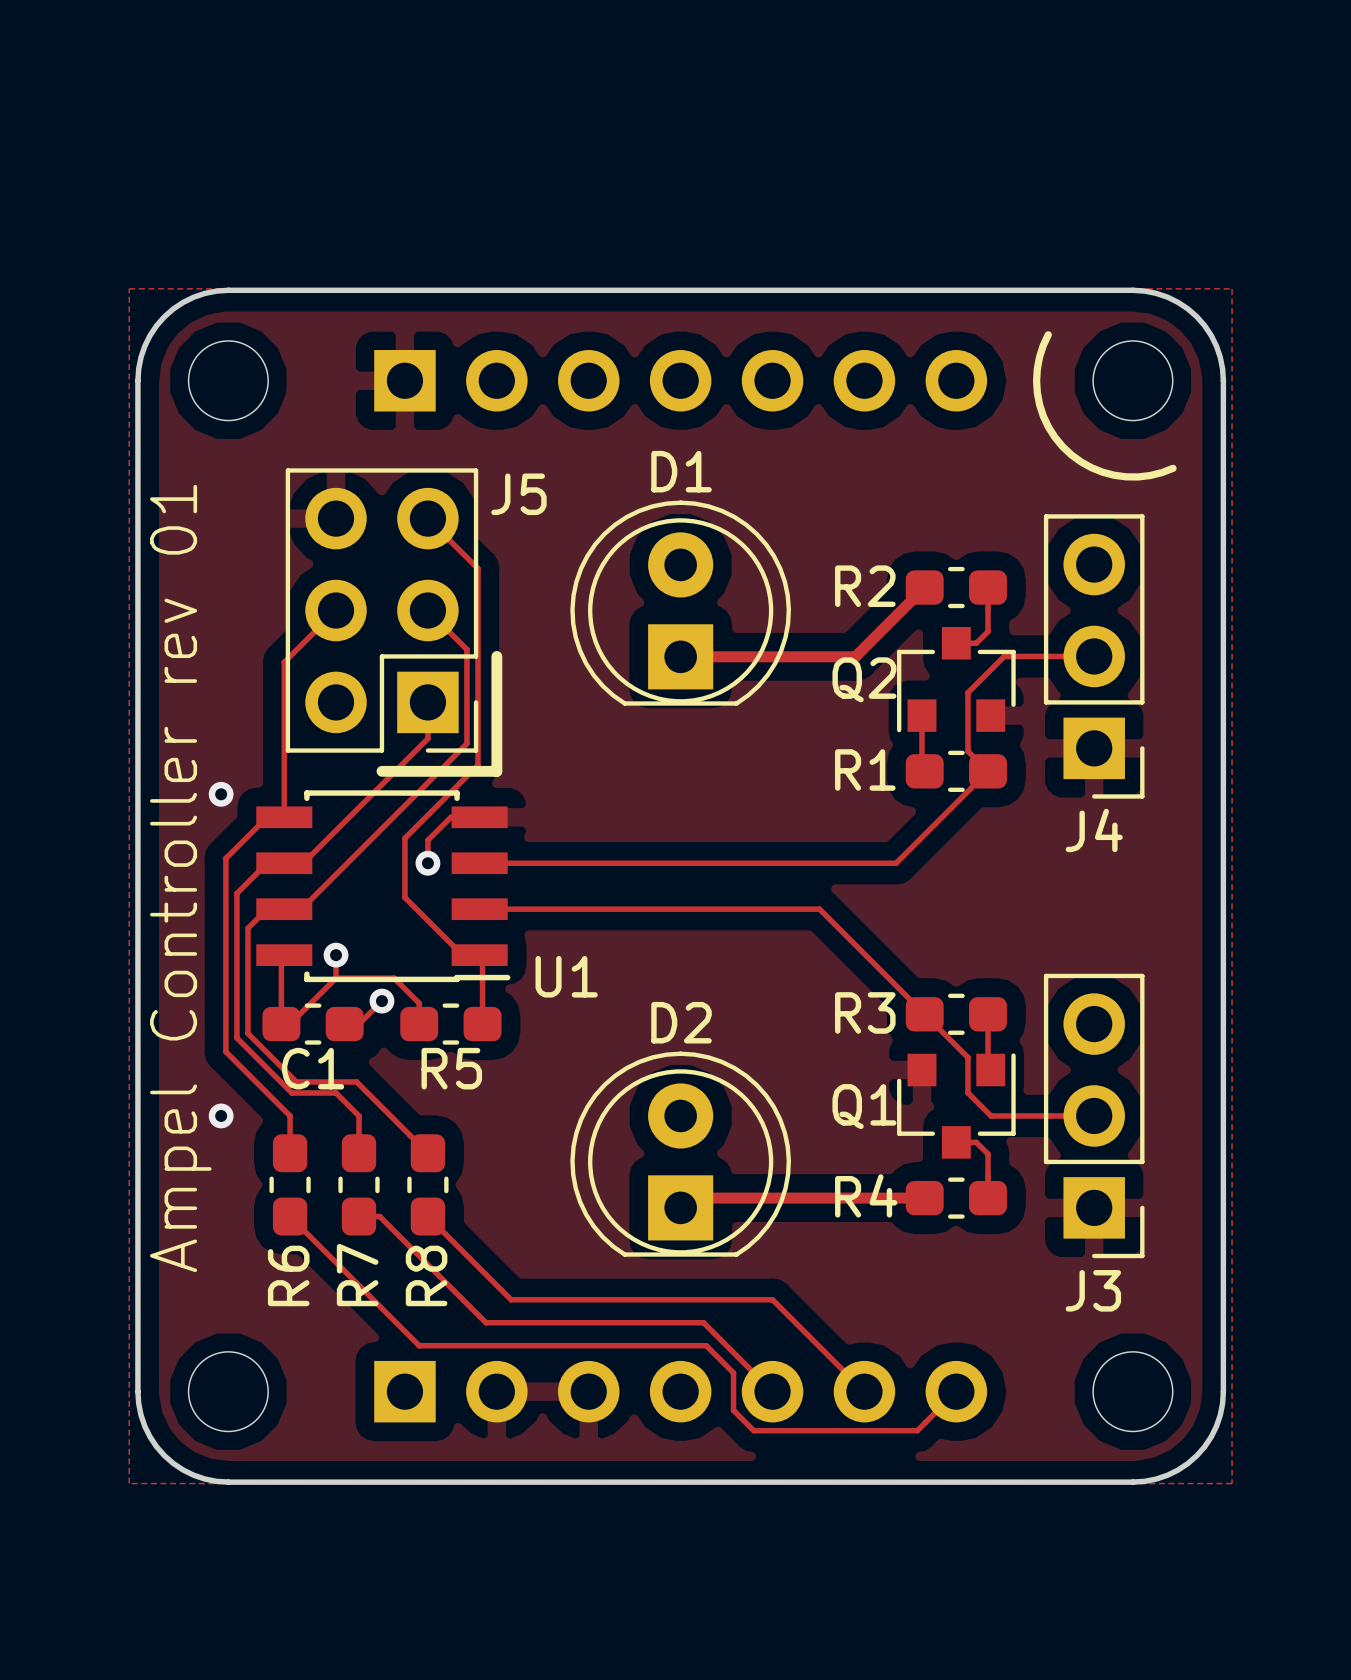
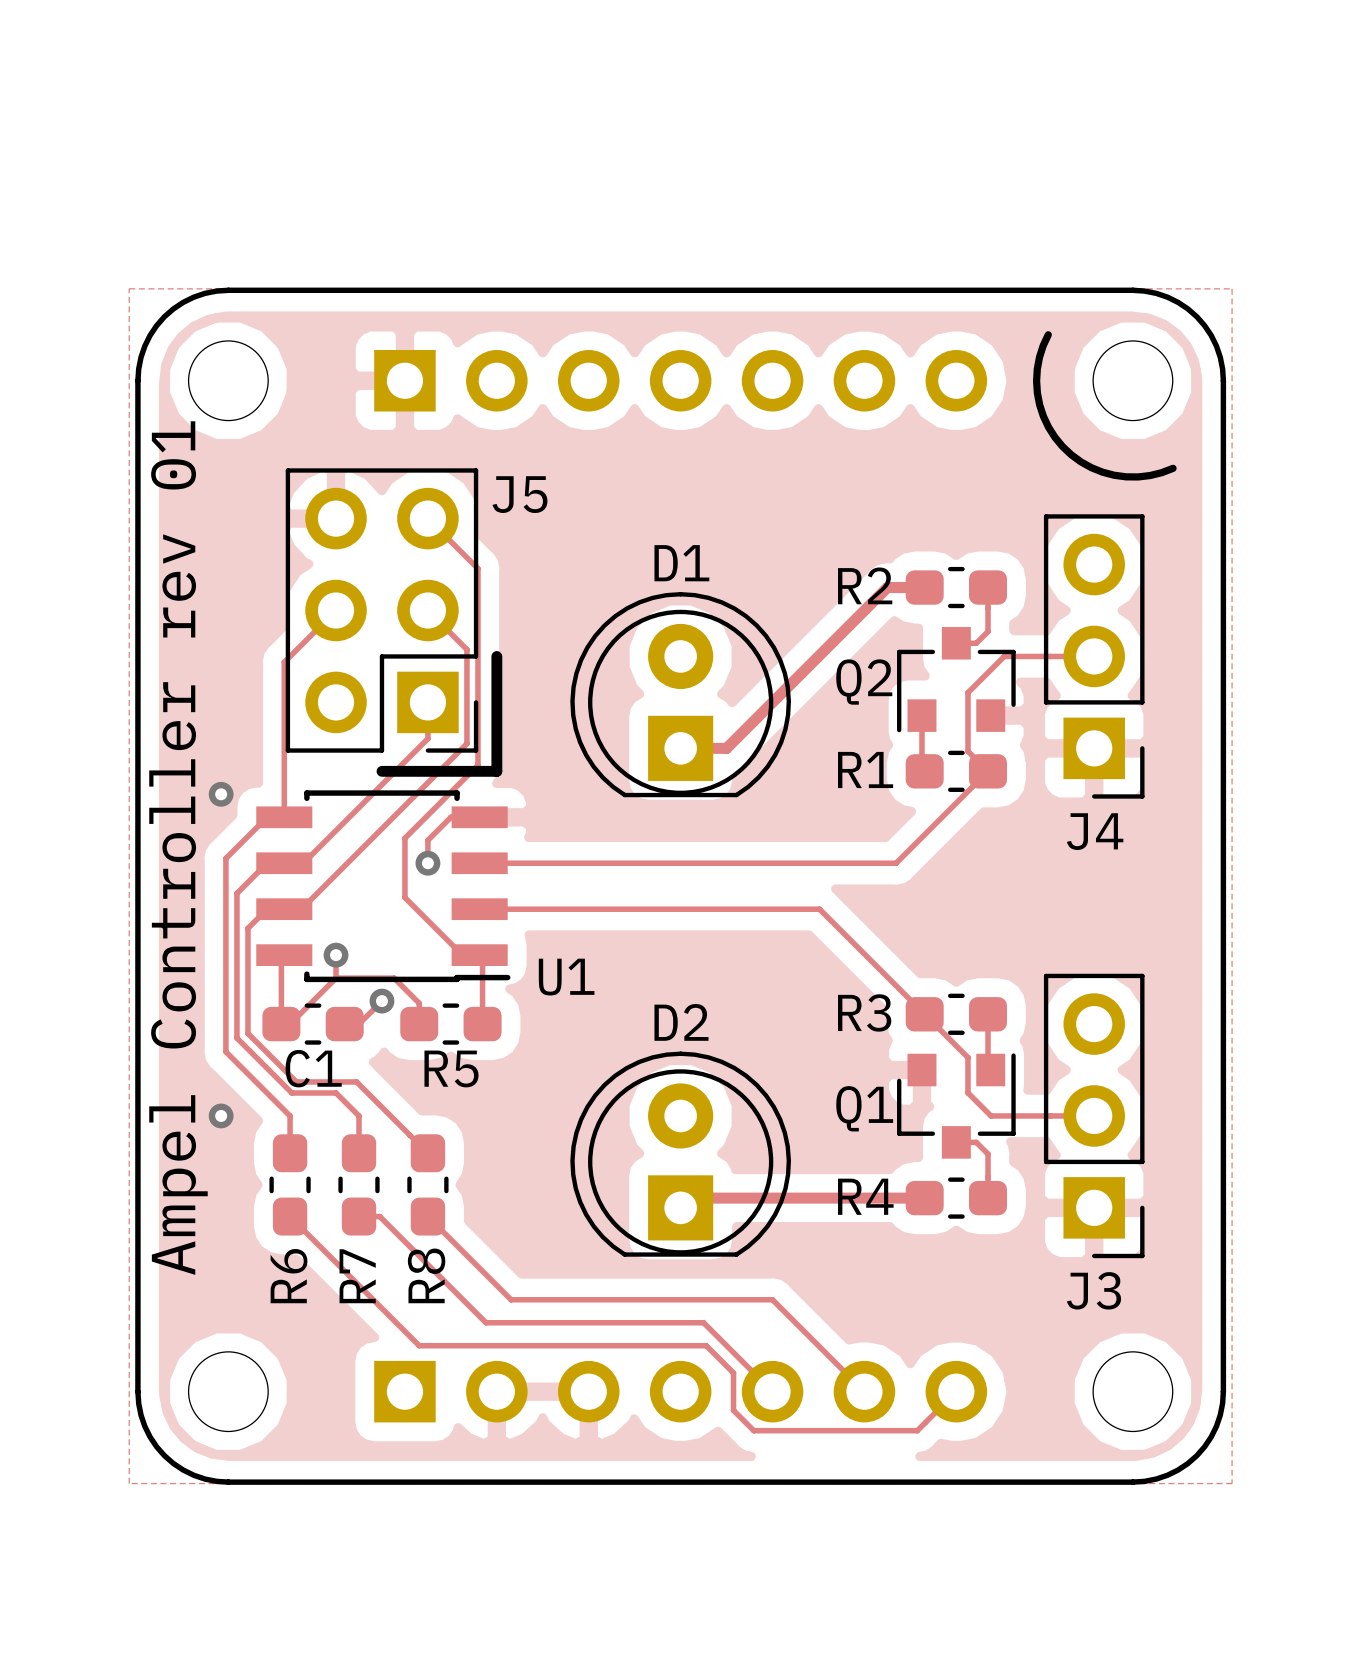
track: (924, 587) (855, 656) (680, 656) -> (924, 587) (887, 587) (726, 748) (680, 748)
D1 position: (680, 603) -> (680, 694)

